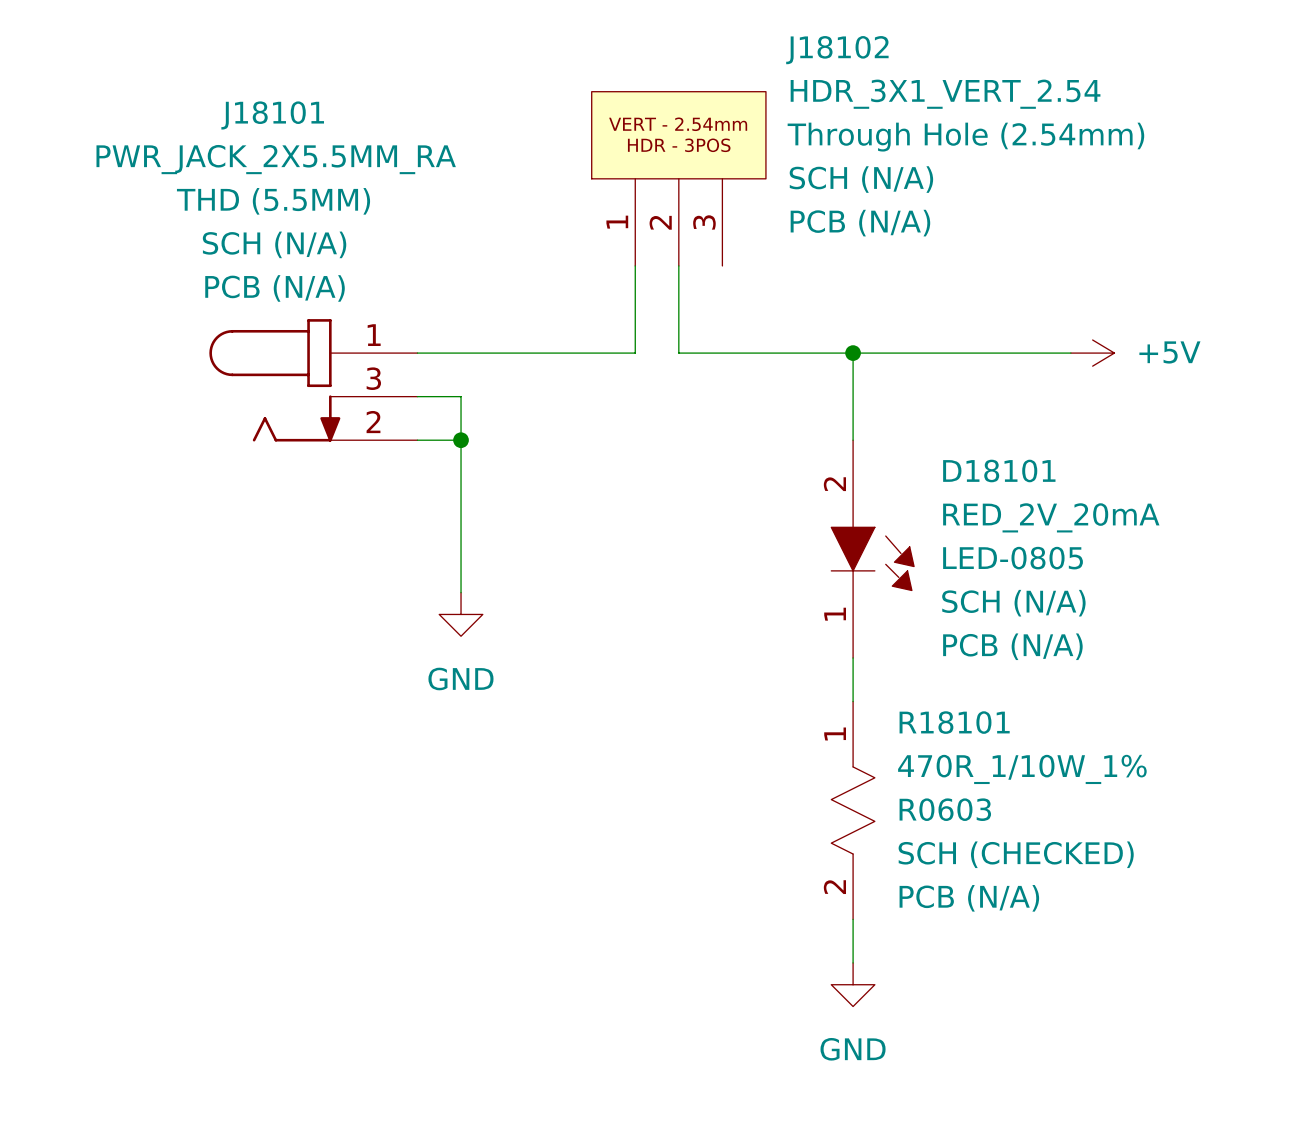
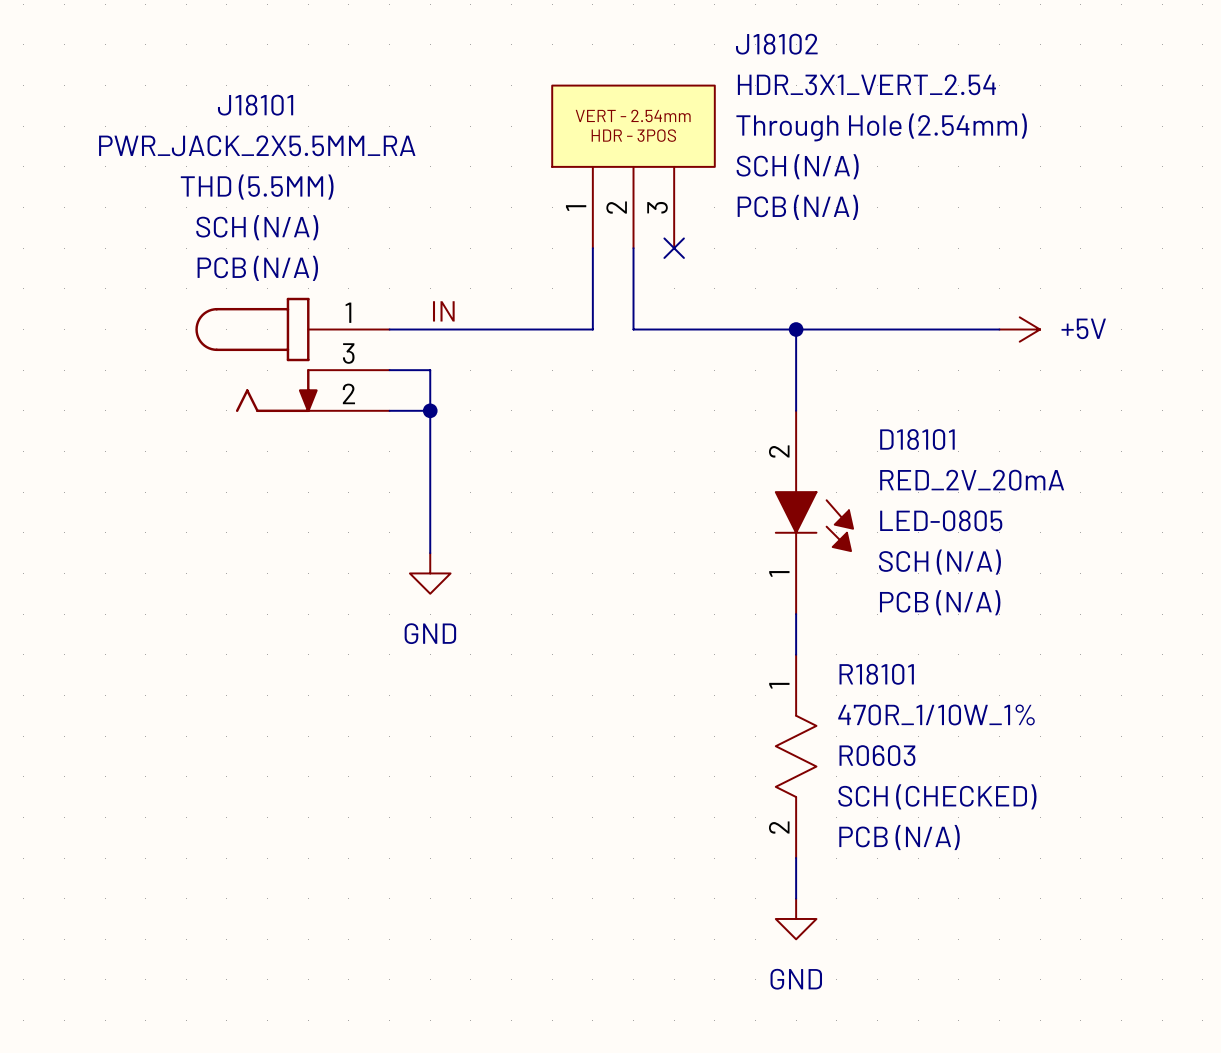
no-connect mark: none -> (674, 248)
label: none -> IN (443, 311)

